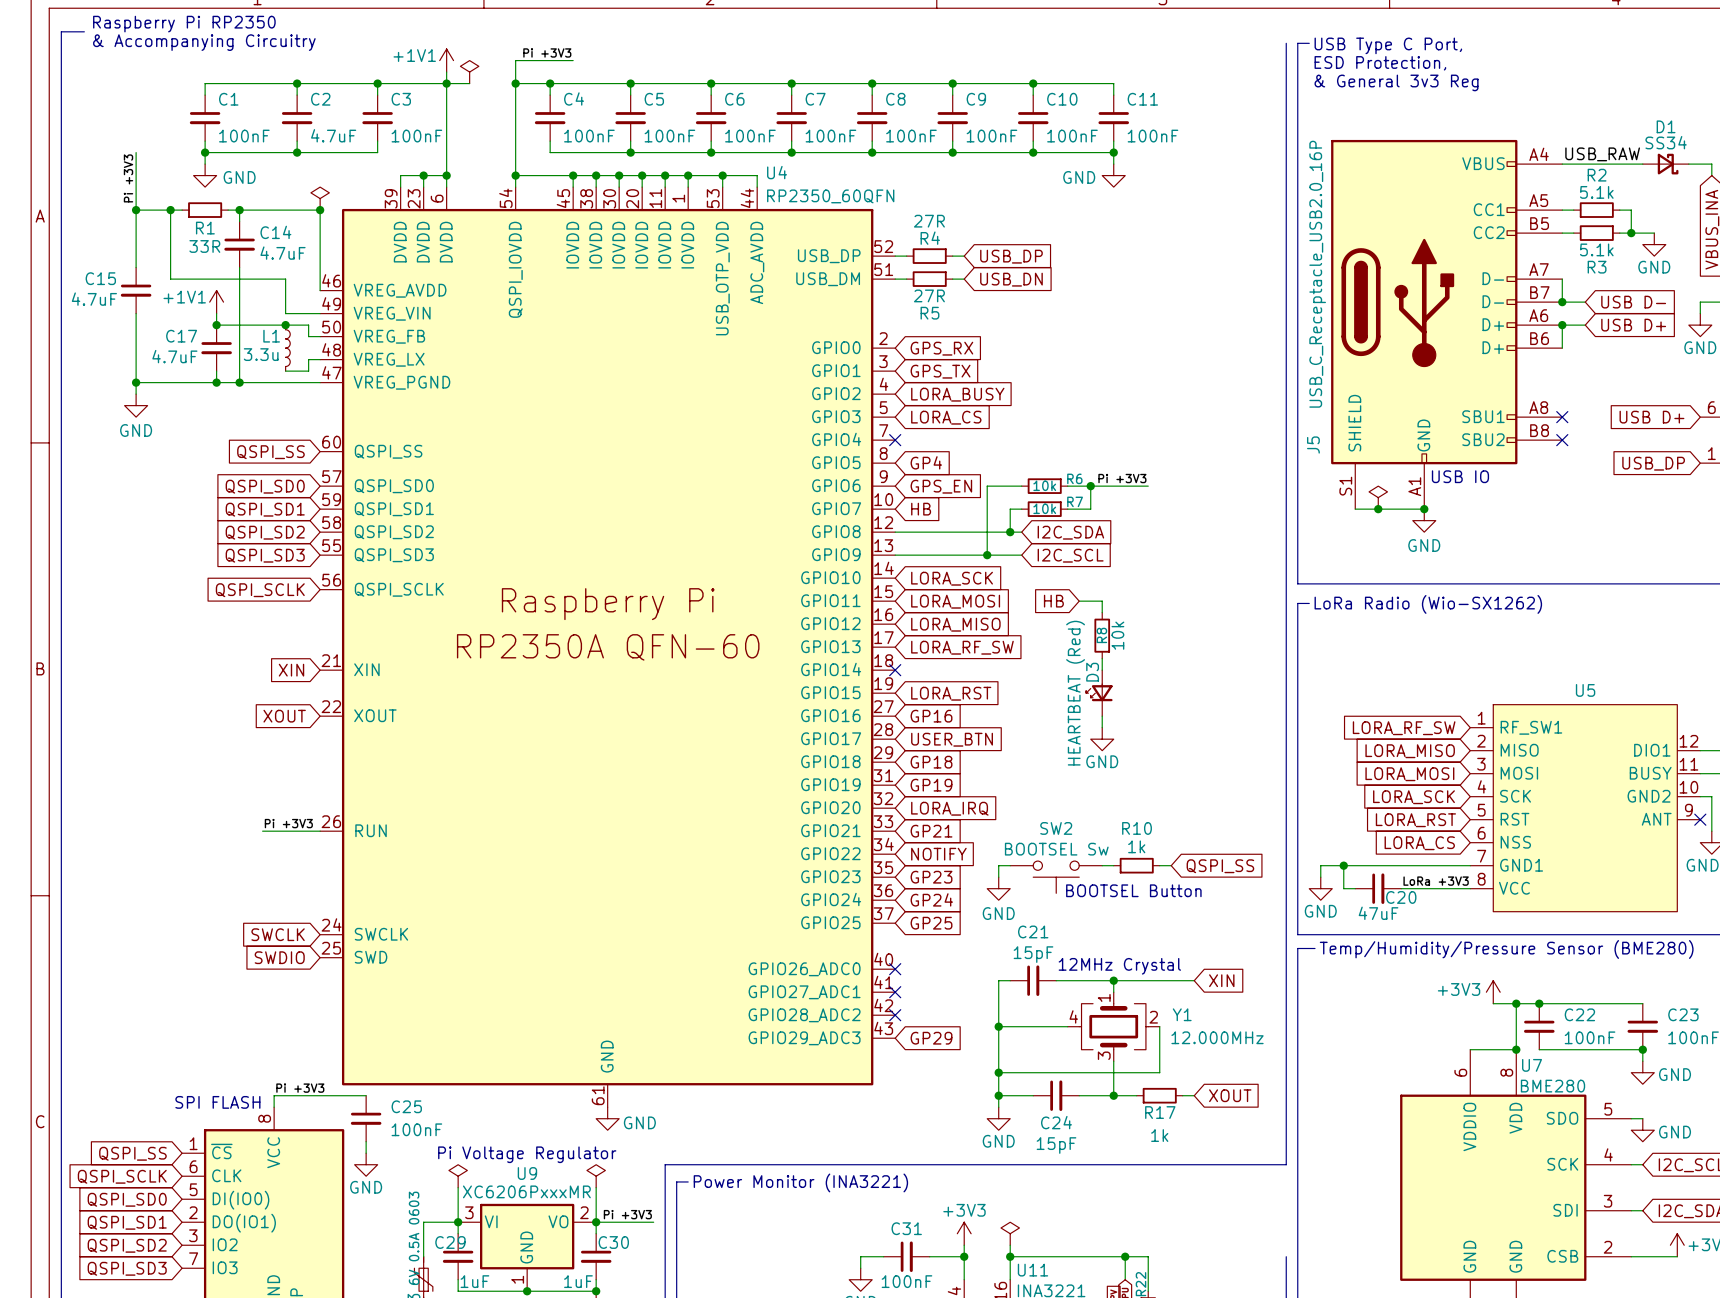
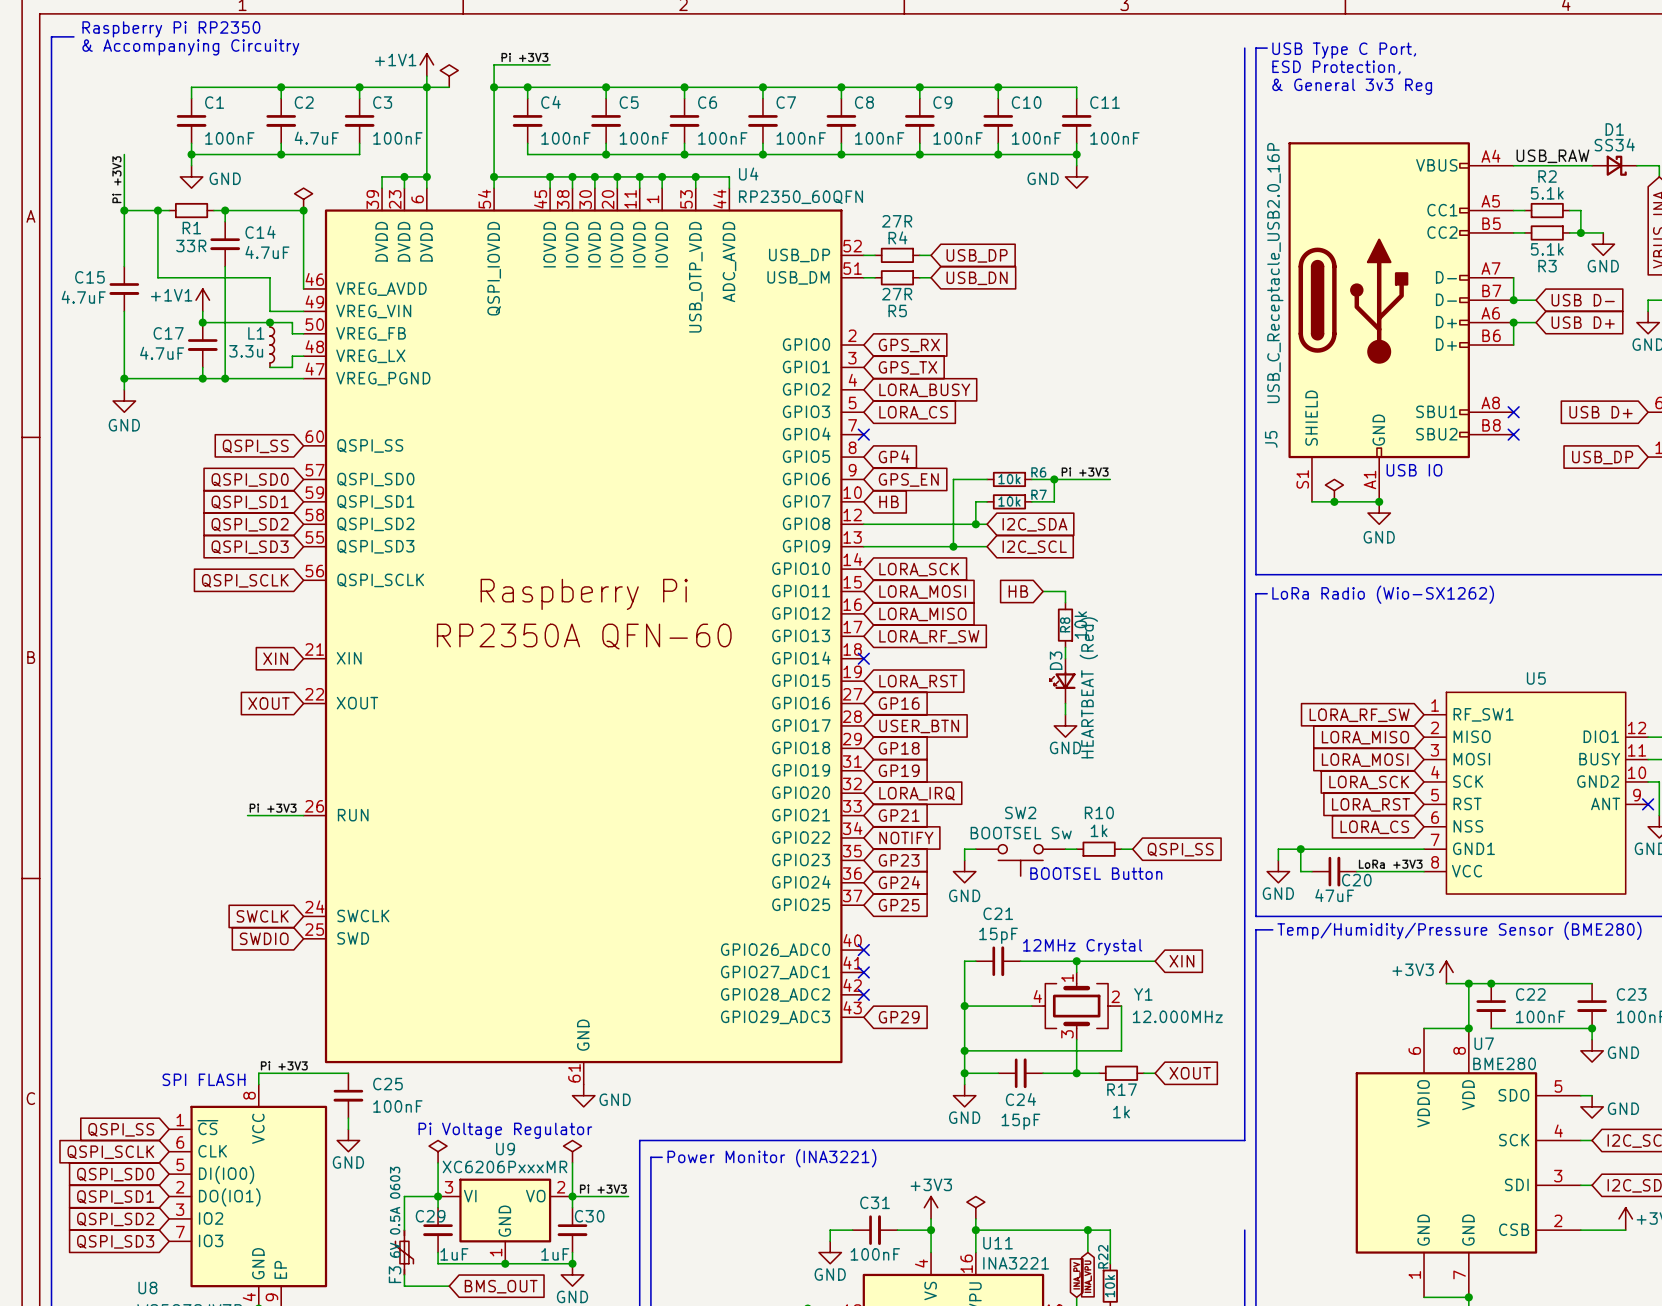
D3 value position: HEARTBEAT (Red) (1075, 693) -> HEARTBEAT (Red) (1088, 687)

